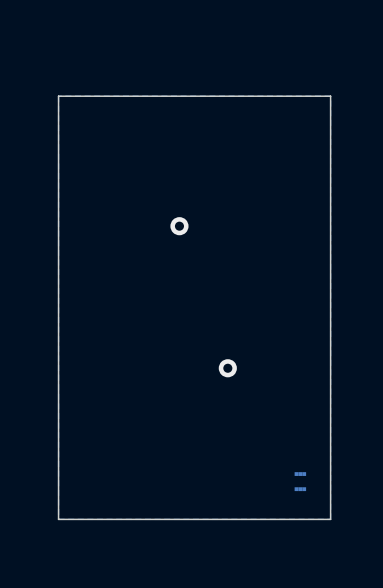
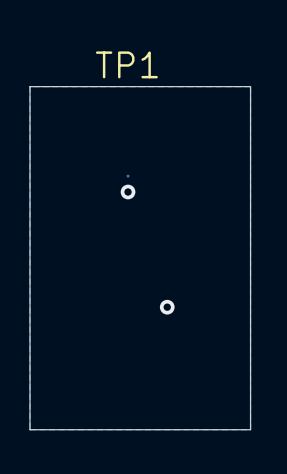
TP1: none -> (128, 176)
part: (300, 474) -> none
part: (300, 489) -> none

